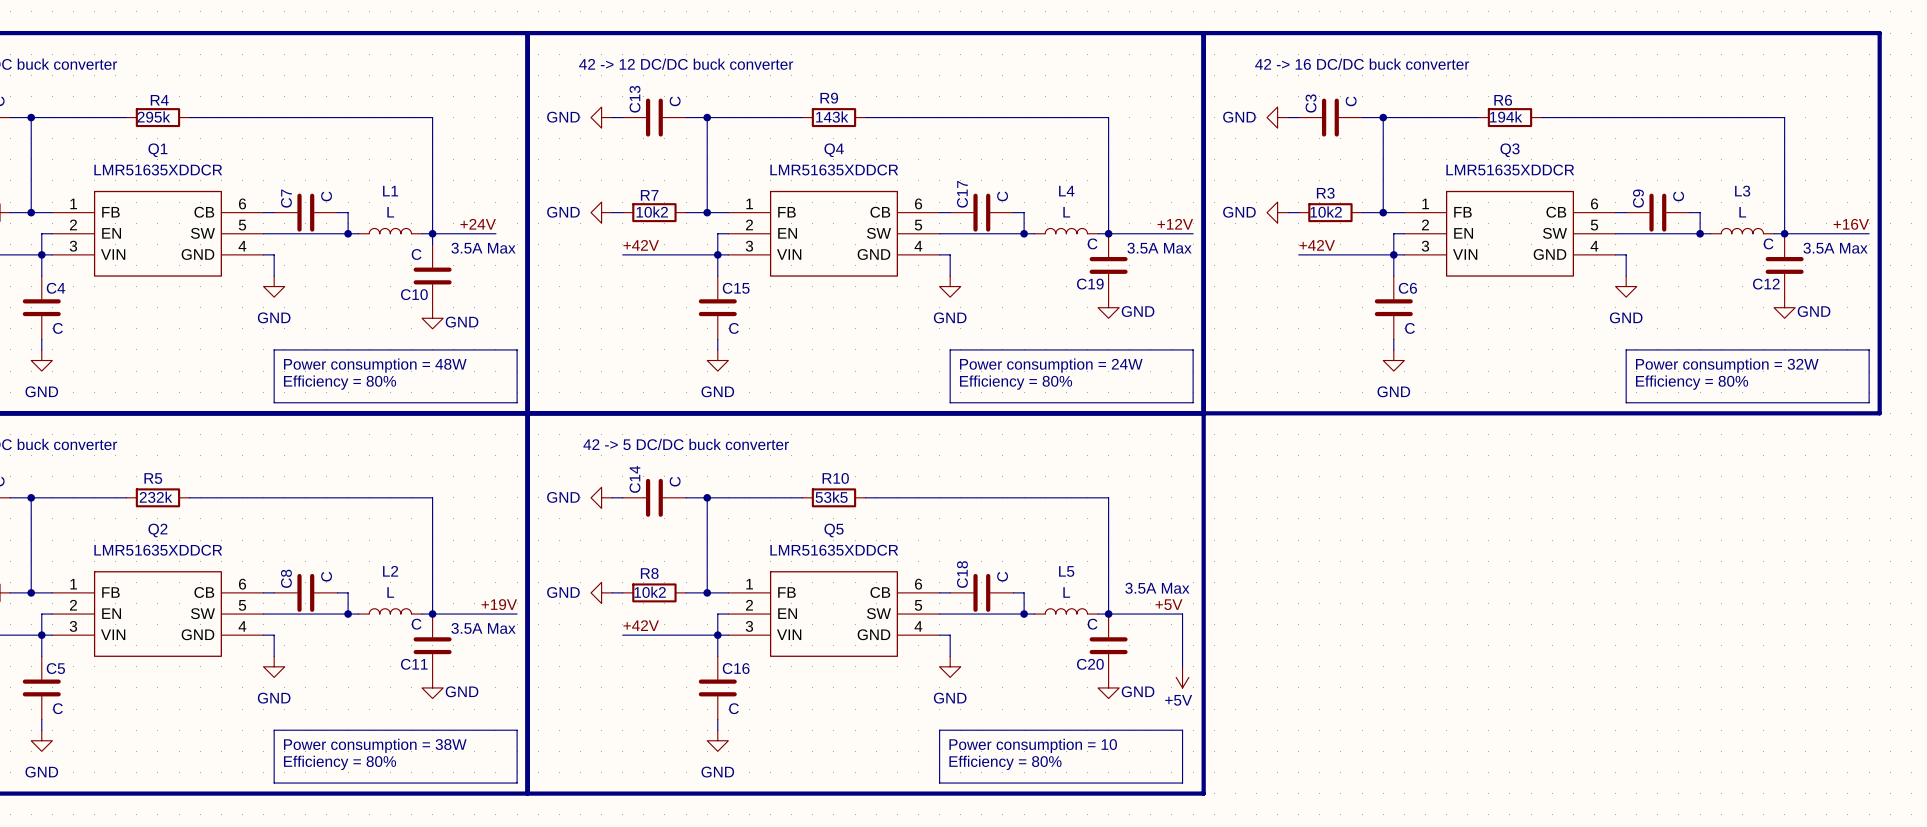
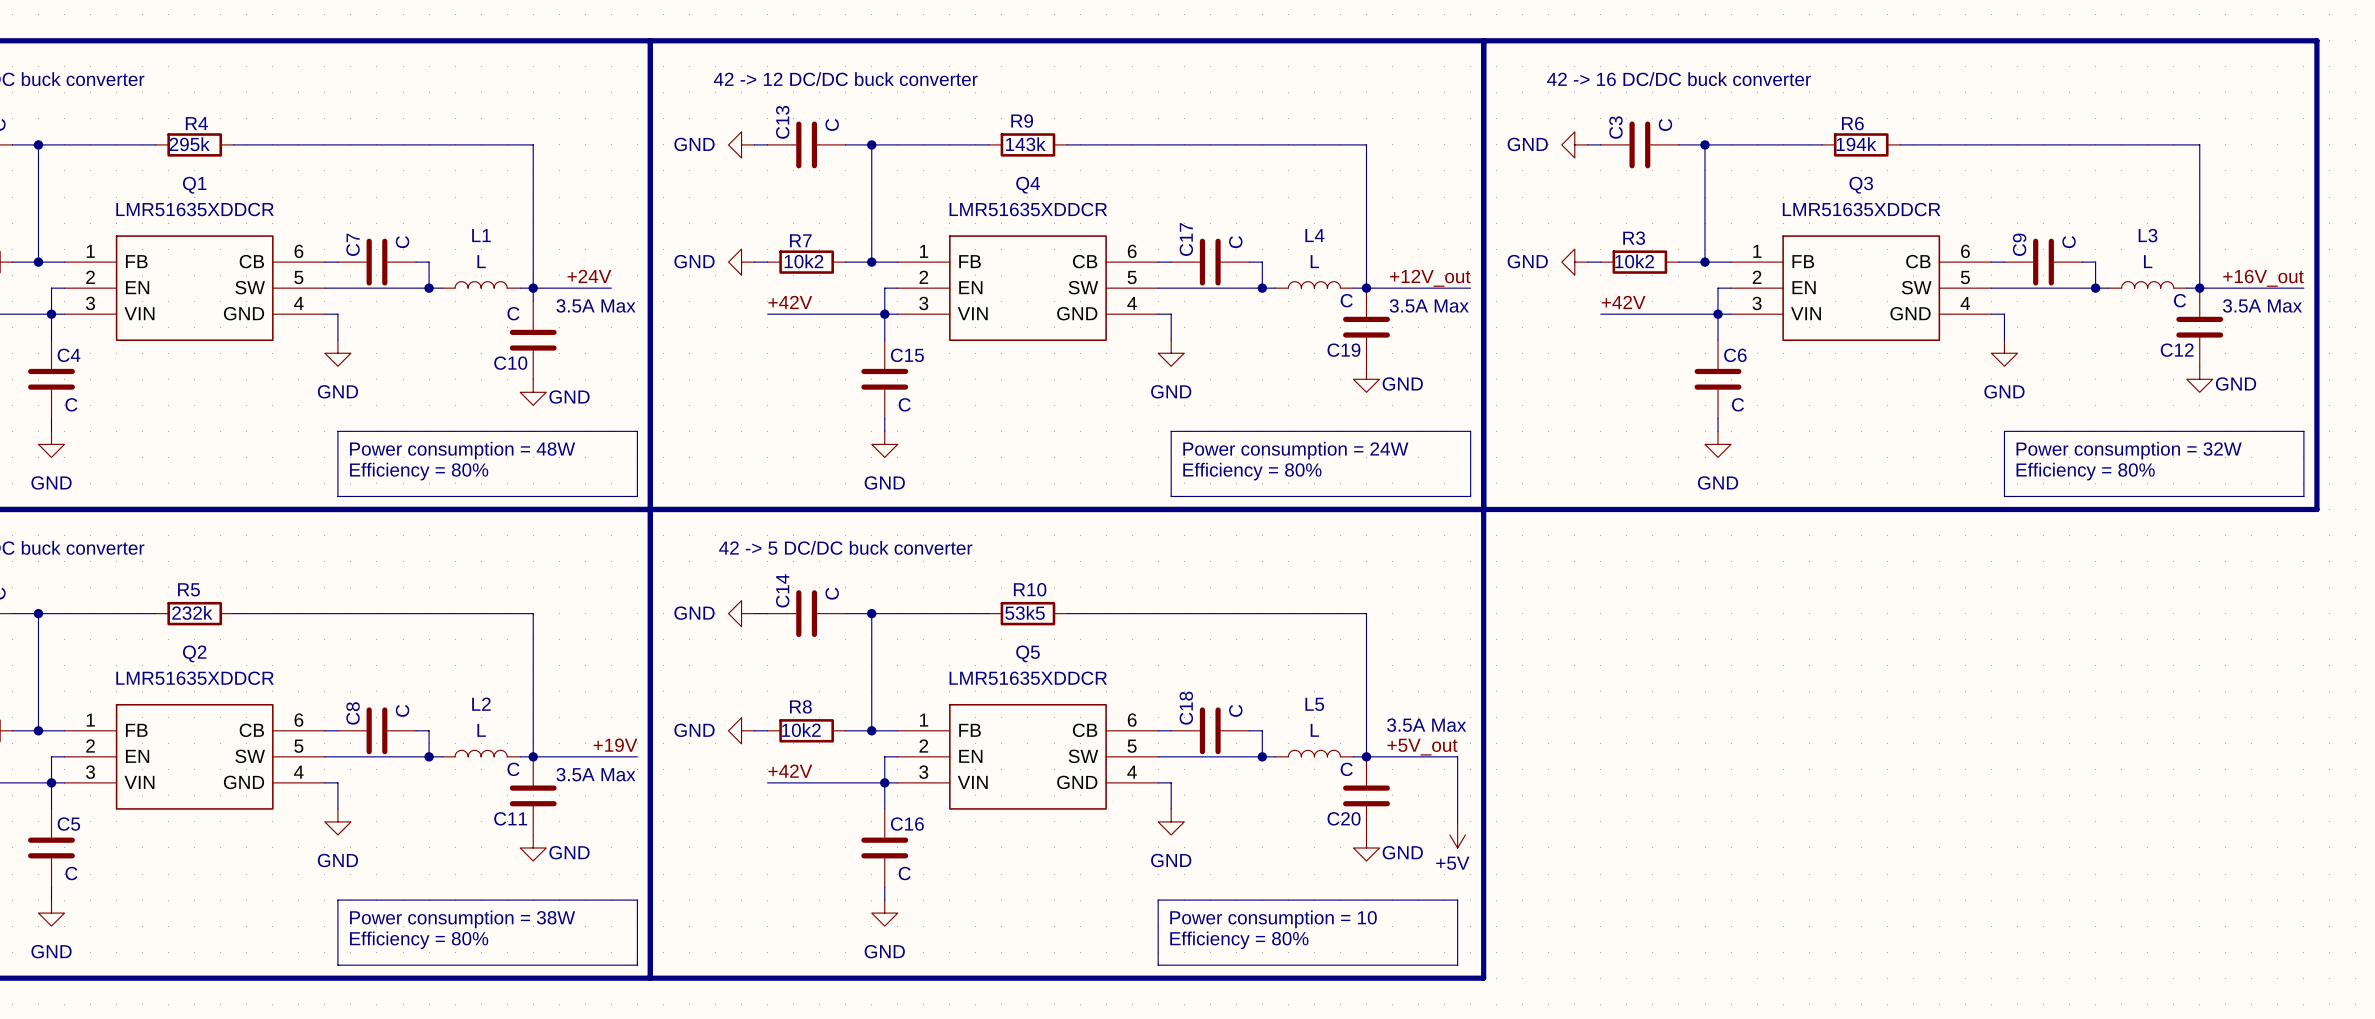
label: +12V (1175, 224) -> +12V_out (1430, 278)
label: +16V (1851, 224) -> +16V_out (2263, 278)
label: +5V (1169, 604) -> +5V_out (1422, 747)

